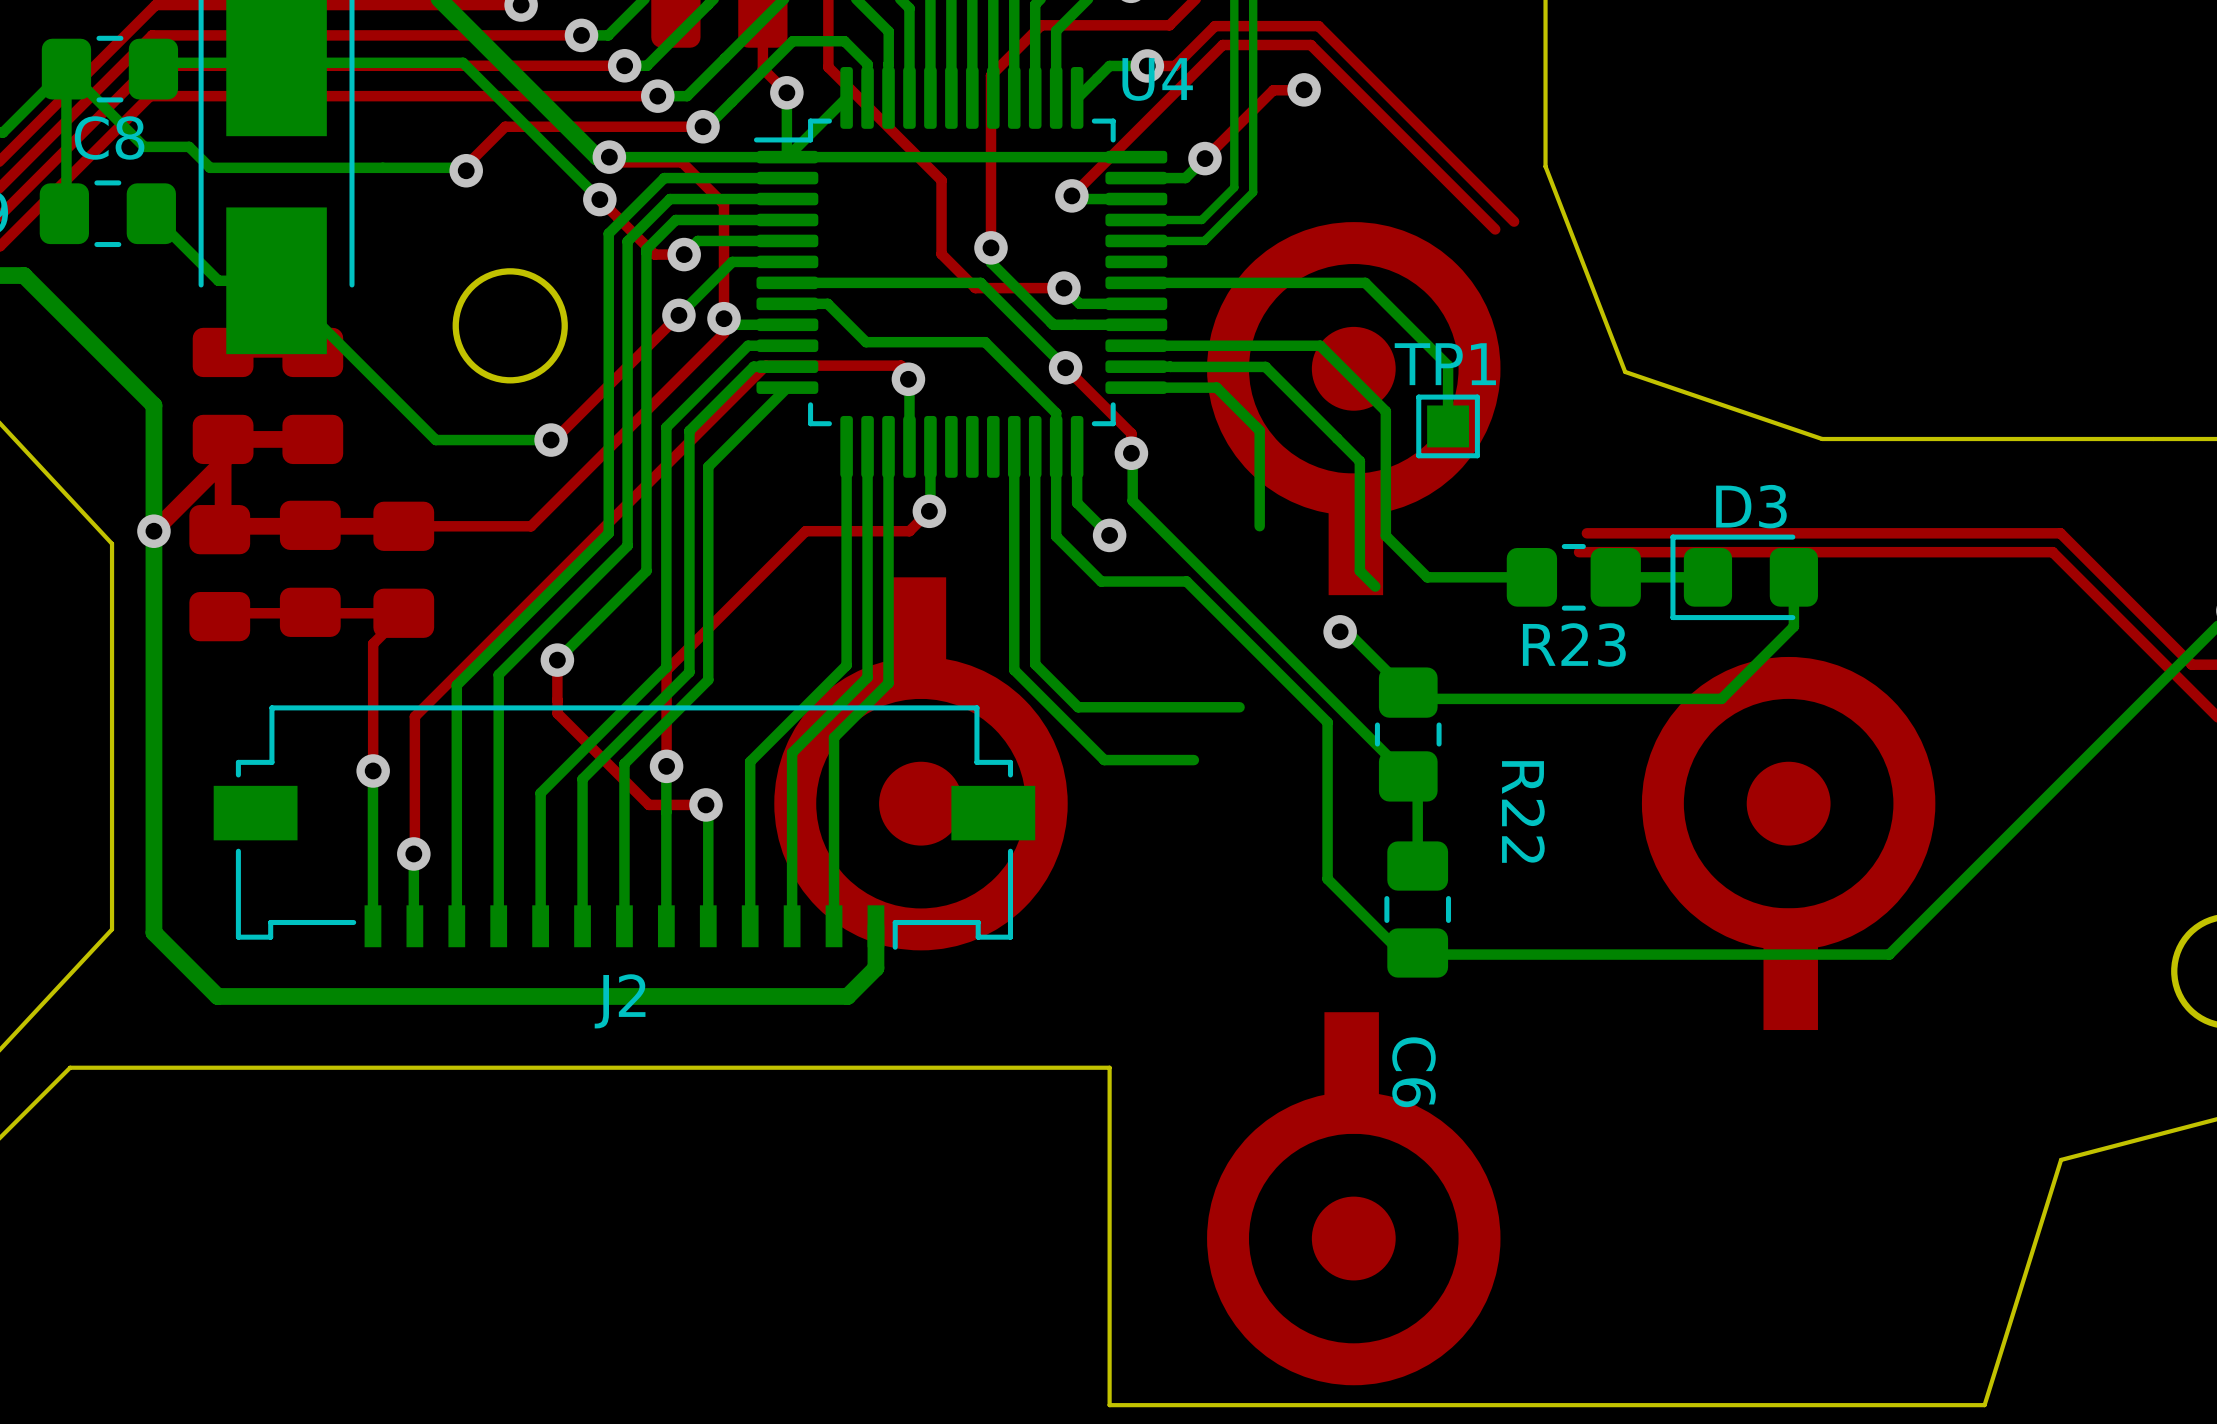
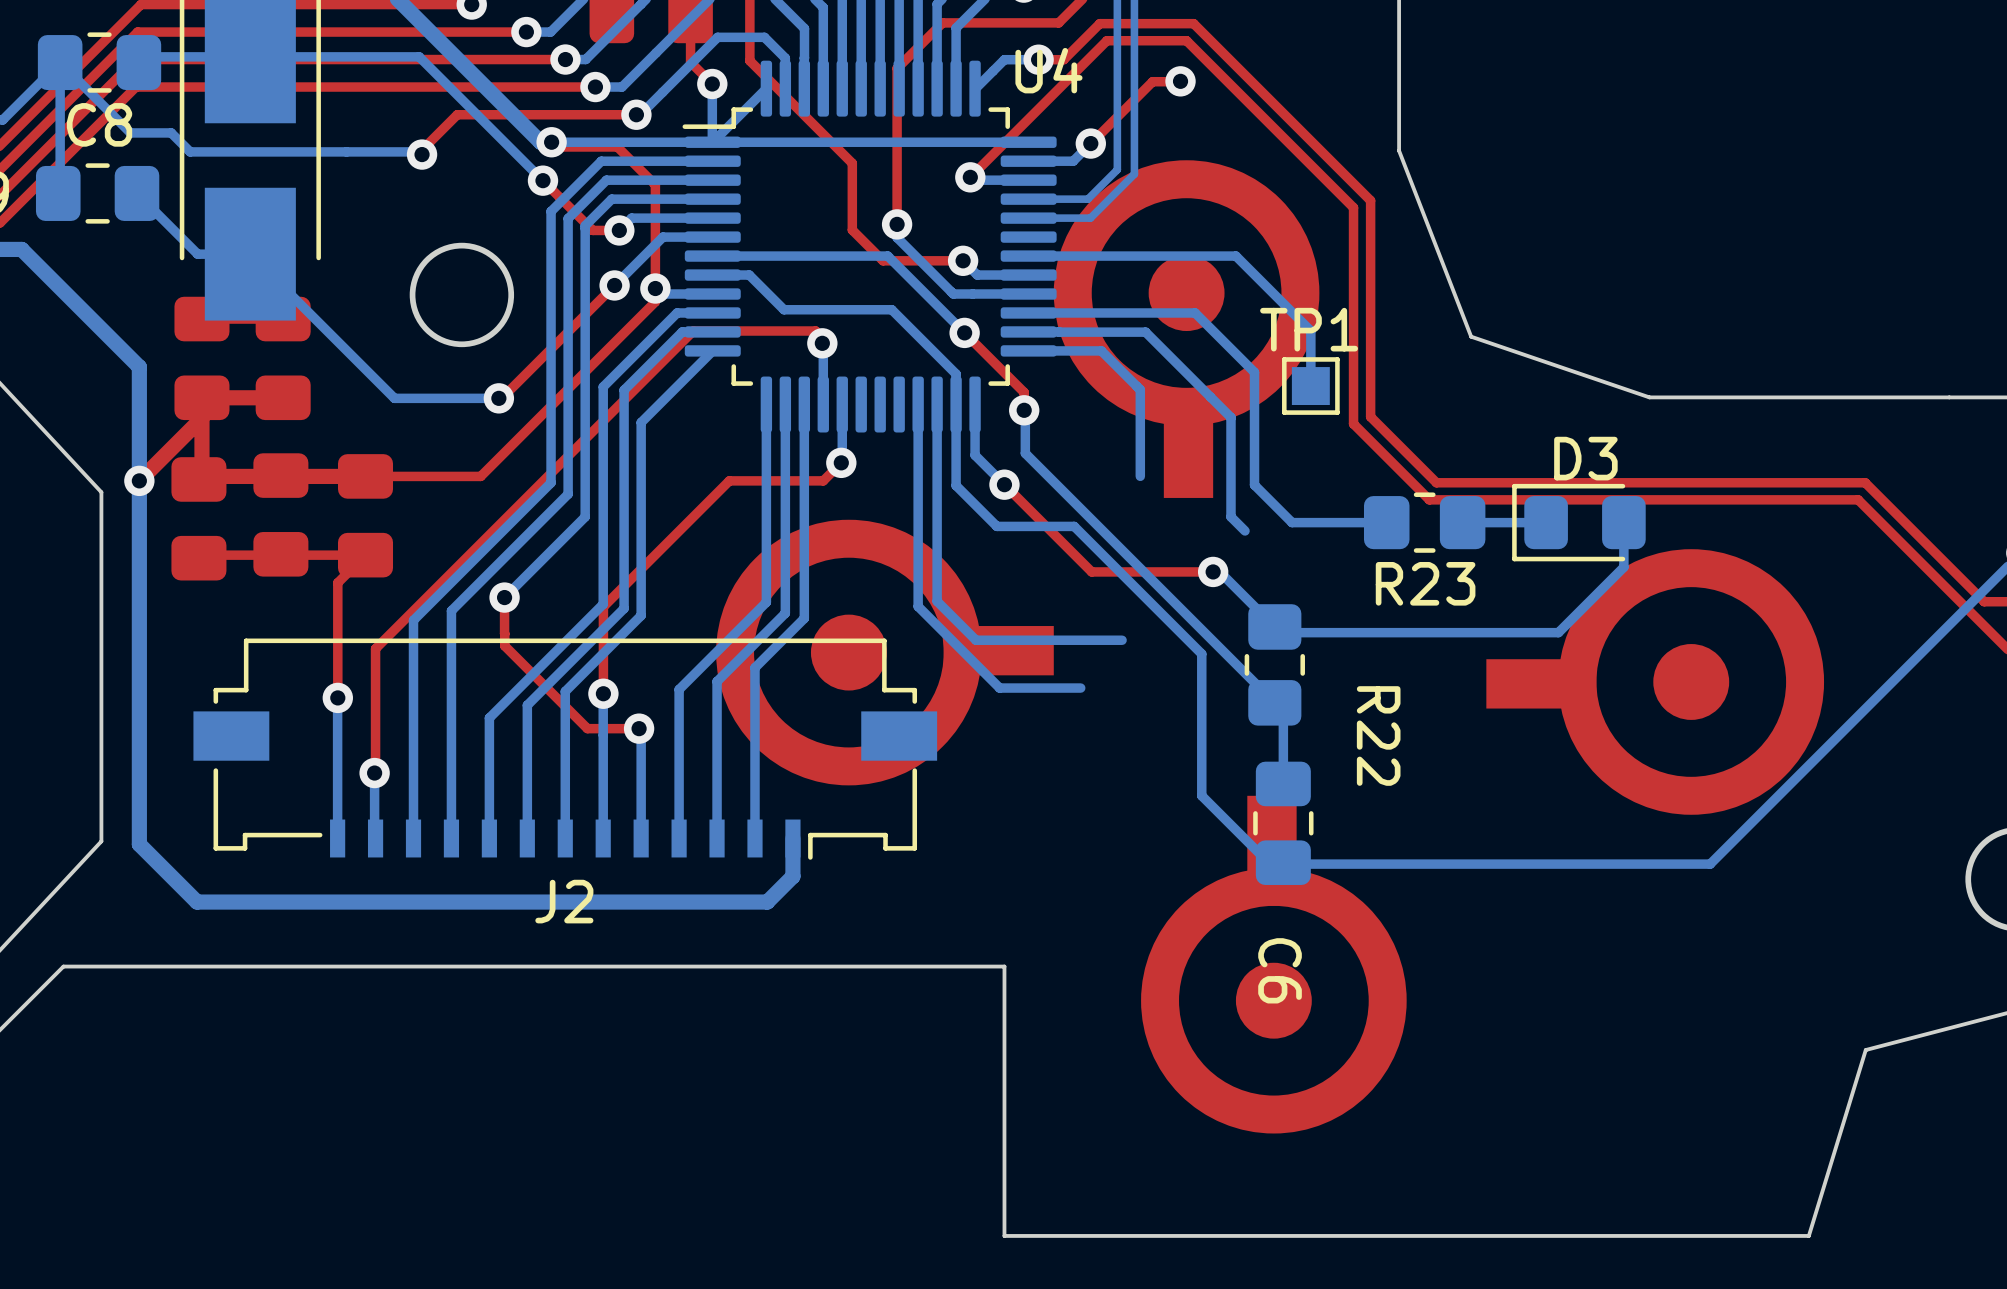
top track: none -> (1370, 200) (1370, 416) (1436, 482)
top track: none -> (1353, 207) (1353, 423) (1429, 499)
part position: (1353, 408) -> (1186, 329)
top track: none -> (1004, 484) (1091, 571) (1213, 571)
part rotation: 0° (921, 763) -> 90° clockwise (884, 652)
part rotation: 0° (1788, 843) -> 90° clockwise (1655, 681)
board edge: (2061, 1159) (1984, 1405) (1109, 1405) (1109, 1365) -> (1865, 1050) (1808, 1235) (1004, 1235)
part position: (1353, 1198) -> (1273, 964)

